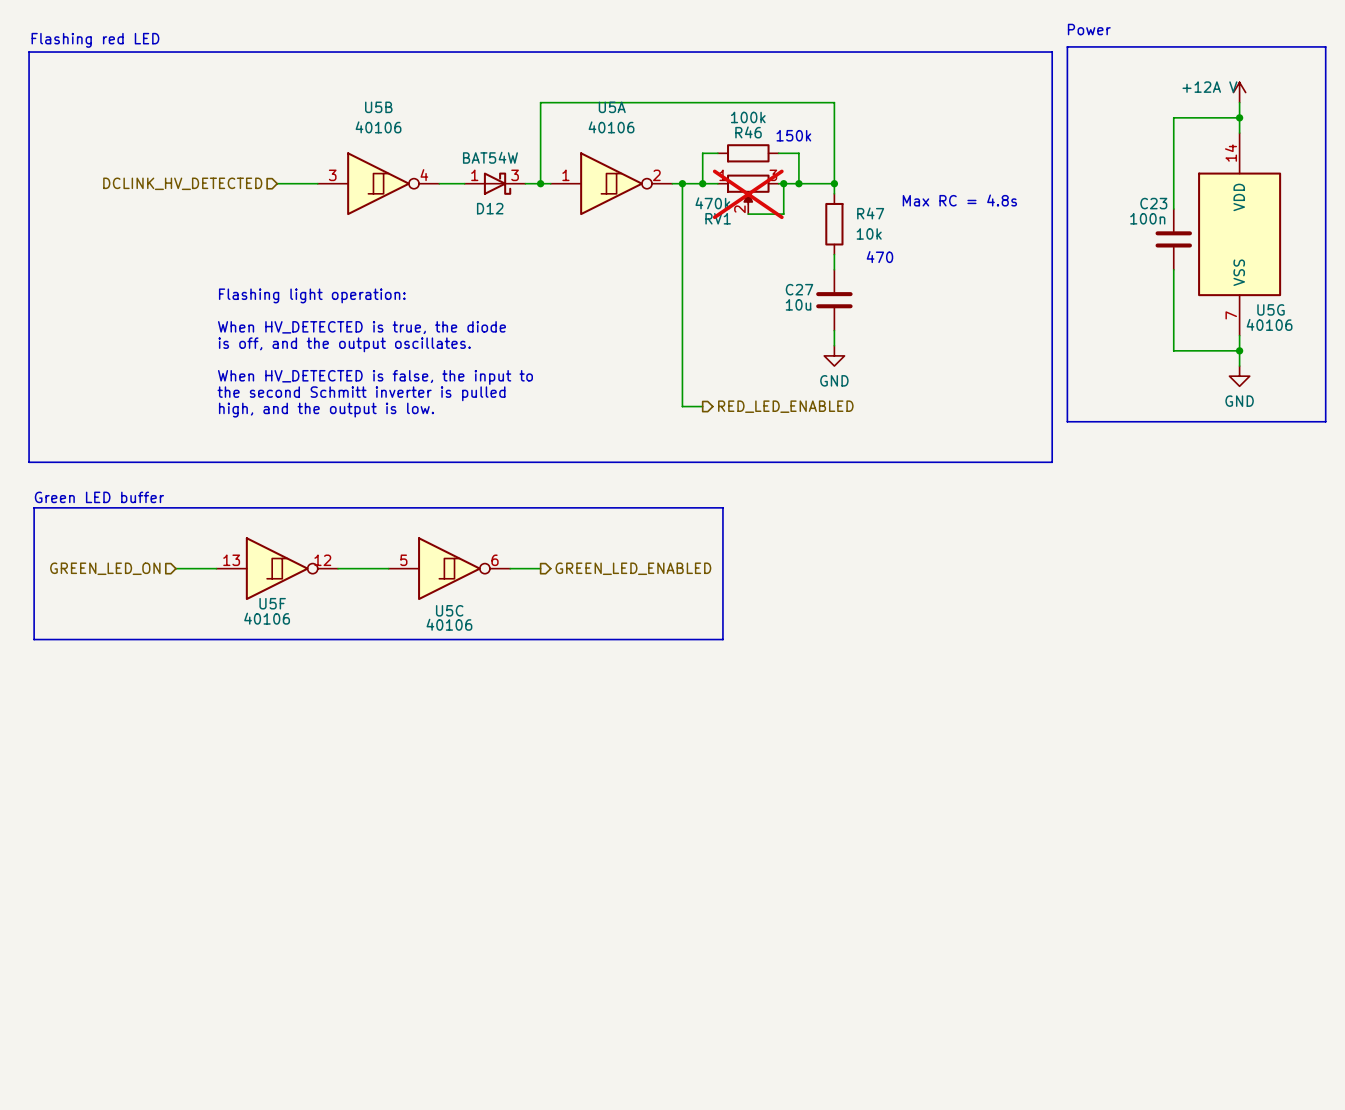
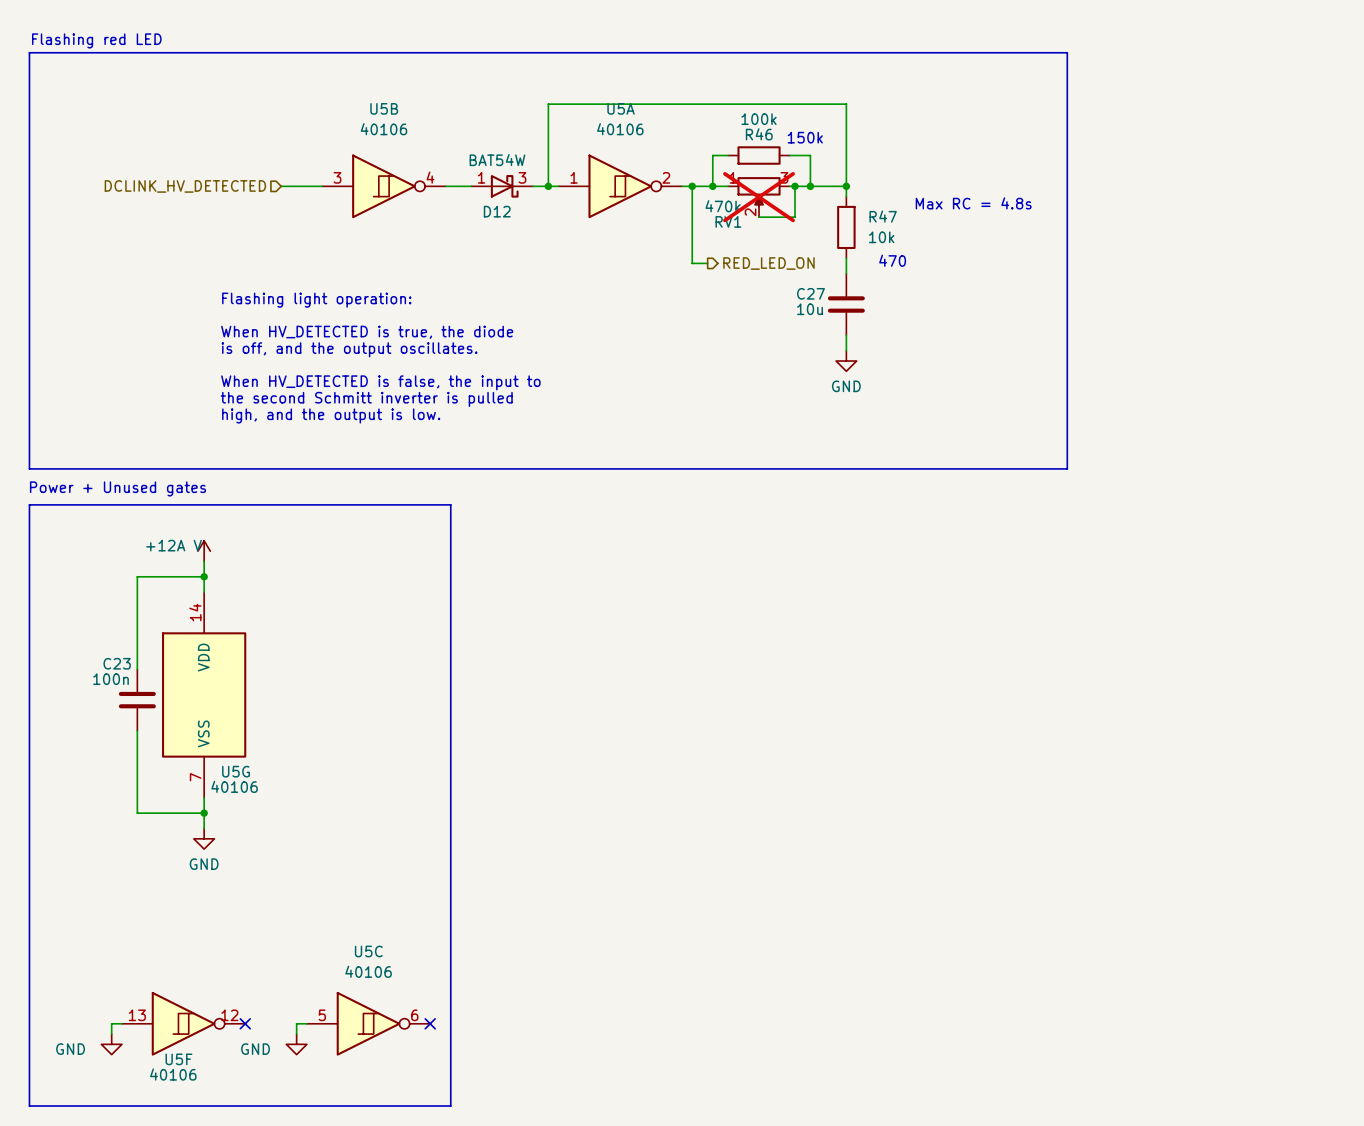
text: Power (1089, 29) -> none
line: (1067, 46) (1325, 46) (1325, 421) (1067, 421) (1067, 46) -> none
power symbol: +12A V (1239, 92) -> none
wire: (1239, 102) (1239, 133) -> none
wire: (1239, 117) (1173, 117) (1173, 209) -> none
junction: (1239, 117) -> none
U5G position: (1239, 234) -> (204, 694)
C23 position: (1173, 239) -> (137, 700)
wire: (682, 259) (682, 406) (702, 406) -> (692, 263) (707, 263)
hierarchical label: none -> RED_LED_ON (768, 263)
wire: (1173, 269) (1173, 350) (1239, 350) -> none
wire: (1239, 335) (1239, 366) -> none
junction: (1239, 350) -> none
power symbol: GND (1239, 376) -> none
hierarchical label: RED_LED_ENABLED (785, 406) -> none
text: none -> Power + Unused gates (118, 488)
line: none -> (29, 504) (450, 504) (450, 1106) (29, 1106) (29, 504)
text: Green LED buffer (99, 497) -> none
line: (34, 507) (722, 507) (722, 639) (34, 639) (34, 507) -> none
power symbol: none -> +12A V (204, 551)
wire: none -> (204, 561) (204, 592)
hierarchical label: GREEN_LED_ON (105, 568) -> none
wire: none -> (178, 576) (137, 576) (137, 669)
wire: (201, 568) (216, 568) -> none
junction: none -> (204, 576)
U5F position: (277, 568) -> (183, 1023)
wire: (338, 568) (388, 568) -> none
U5C position: (449, 568) -> (368, 1023)
wire: (510, 568) (540, 568) -> none
hierarchical label: GREEN_LED_ENABLED (633, 568) -> none
U5C name position: U5C (449, 610) -> U5C (368, 951)
U5C value position: 40106 (449, 624) -> 40106 (368, 971)
wire: none -> (137, 730) (137, 813) (204, 813)
wire: none -> (204, 797) (204, 828)
junction: none -> (204, 813)
power symbol: none -> GND (204, 838)
wire: none -> (121, 1023) (111, 1023) (111, 1034)
no-connect mark: none -> (245, 1023)
wire: none -> (306, 1023) (296, 1023) (296, 1034)
no-connect mark: none -> (430, 1023)
power symbol: none -> GND (111, 1044)
power symbol: none -> GND (296, 1044)

